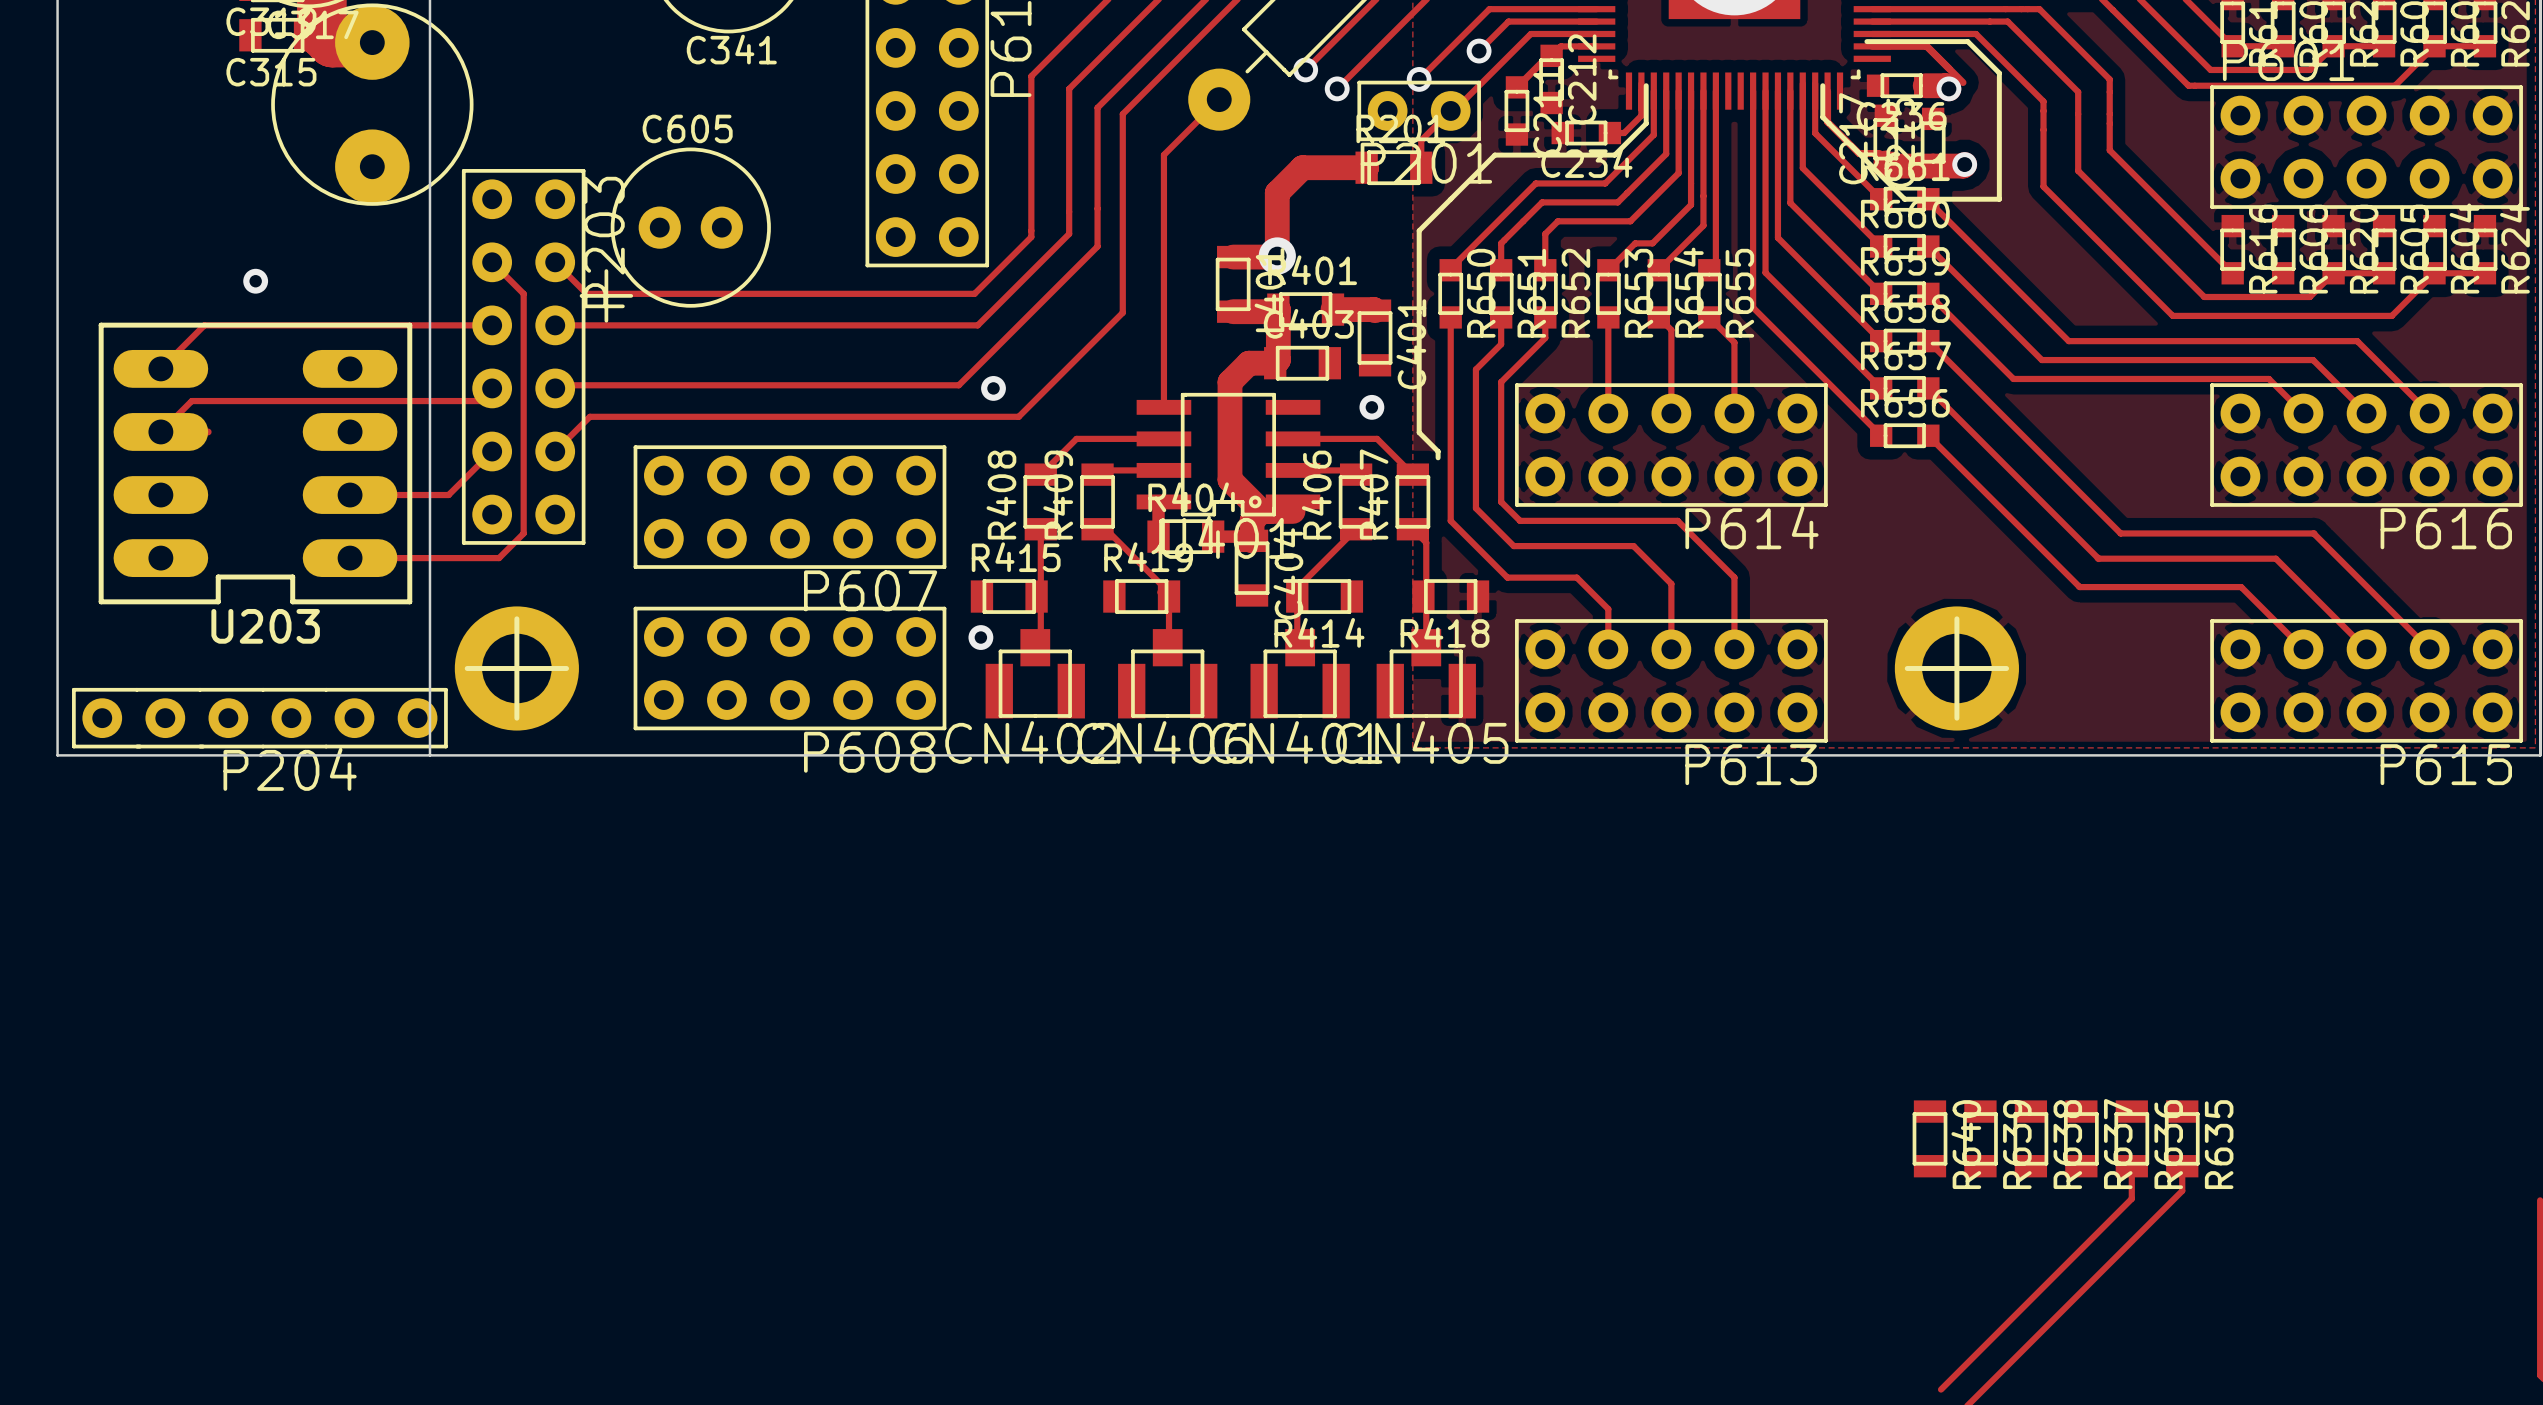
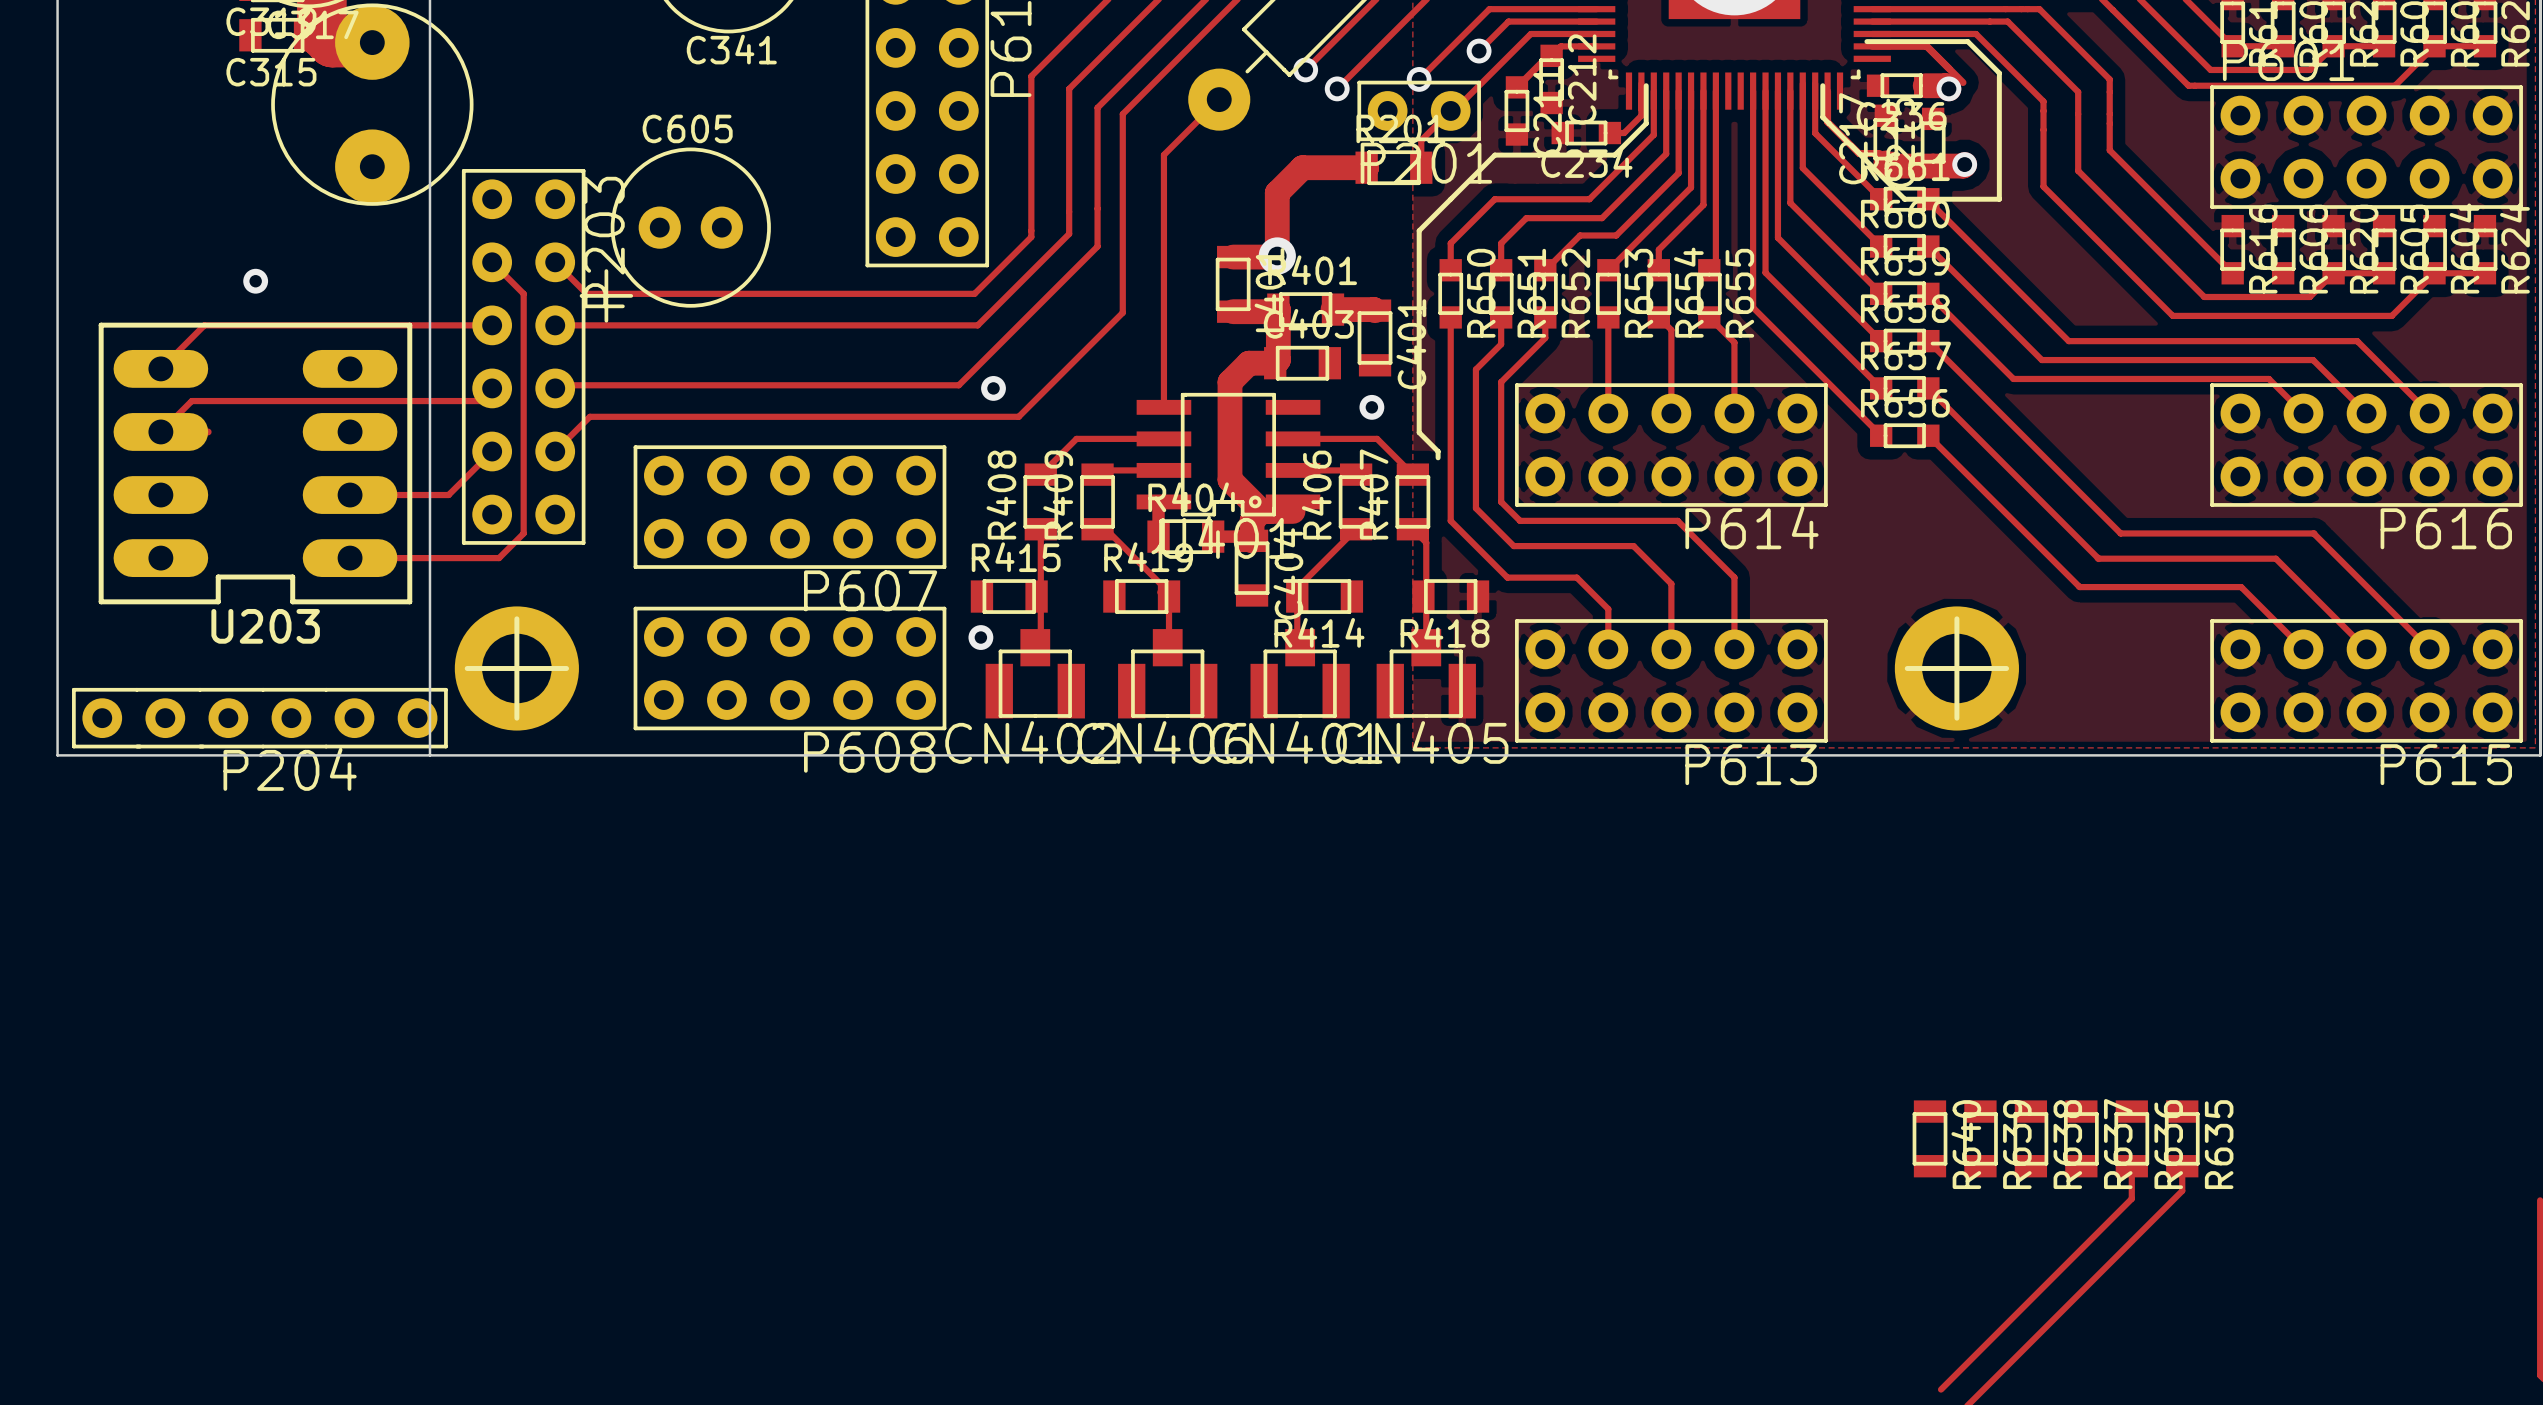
track: (1605, 183) (1535, 183) (1450, 268) -> (1605, 183) (1589, 199) (1494, 199) (1450, 243) (1450, 268)
track: (1691, 187) (1691, 204) (1652, 243) (1635, 243) -> (1691, 187) (1635, 243)
track: (1617, 202) (1542, 202) (1526, 218) -> (1617, 202) (1602, 218) (1526, 218)
track: (1703, 205) (1703, 225) (1658, 270) -> (1703, 205) (1658, 249) (1658, 270)
track: (1630, 221) (1557, 221) (1545, 233) (1545, 270) -> (1630, 221) (1616, 235) (1580, 235) (1545, 270)

